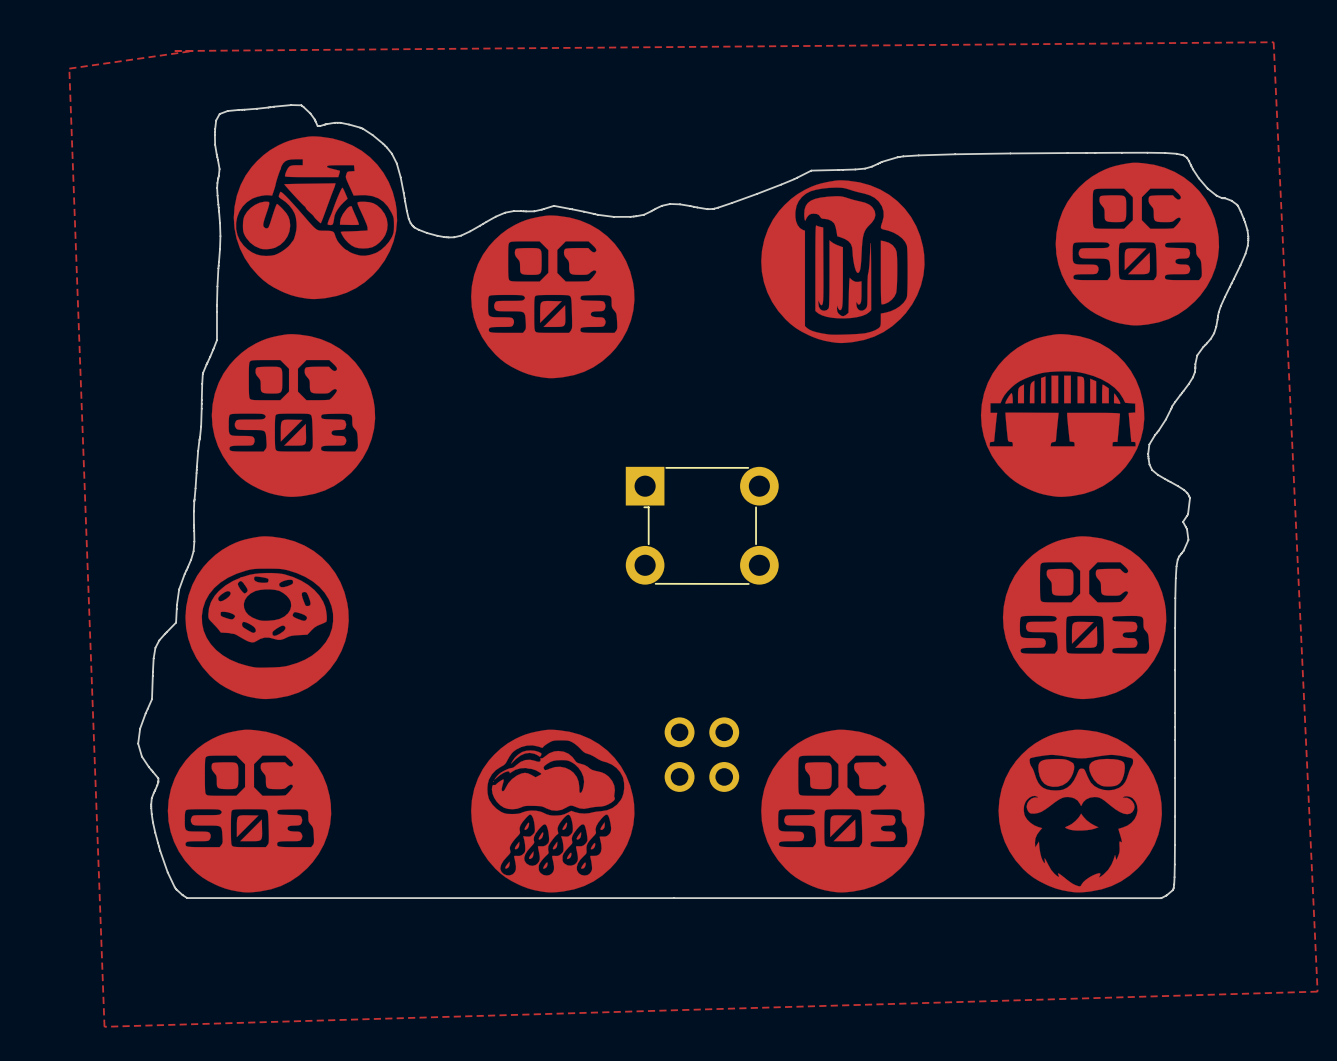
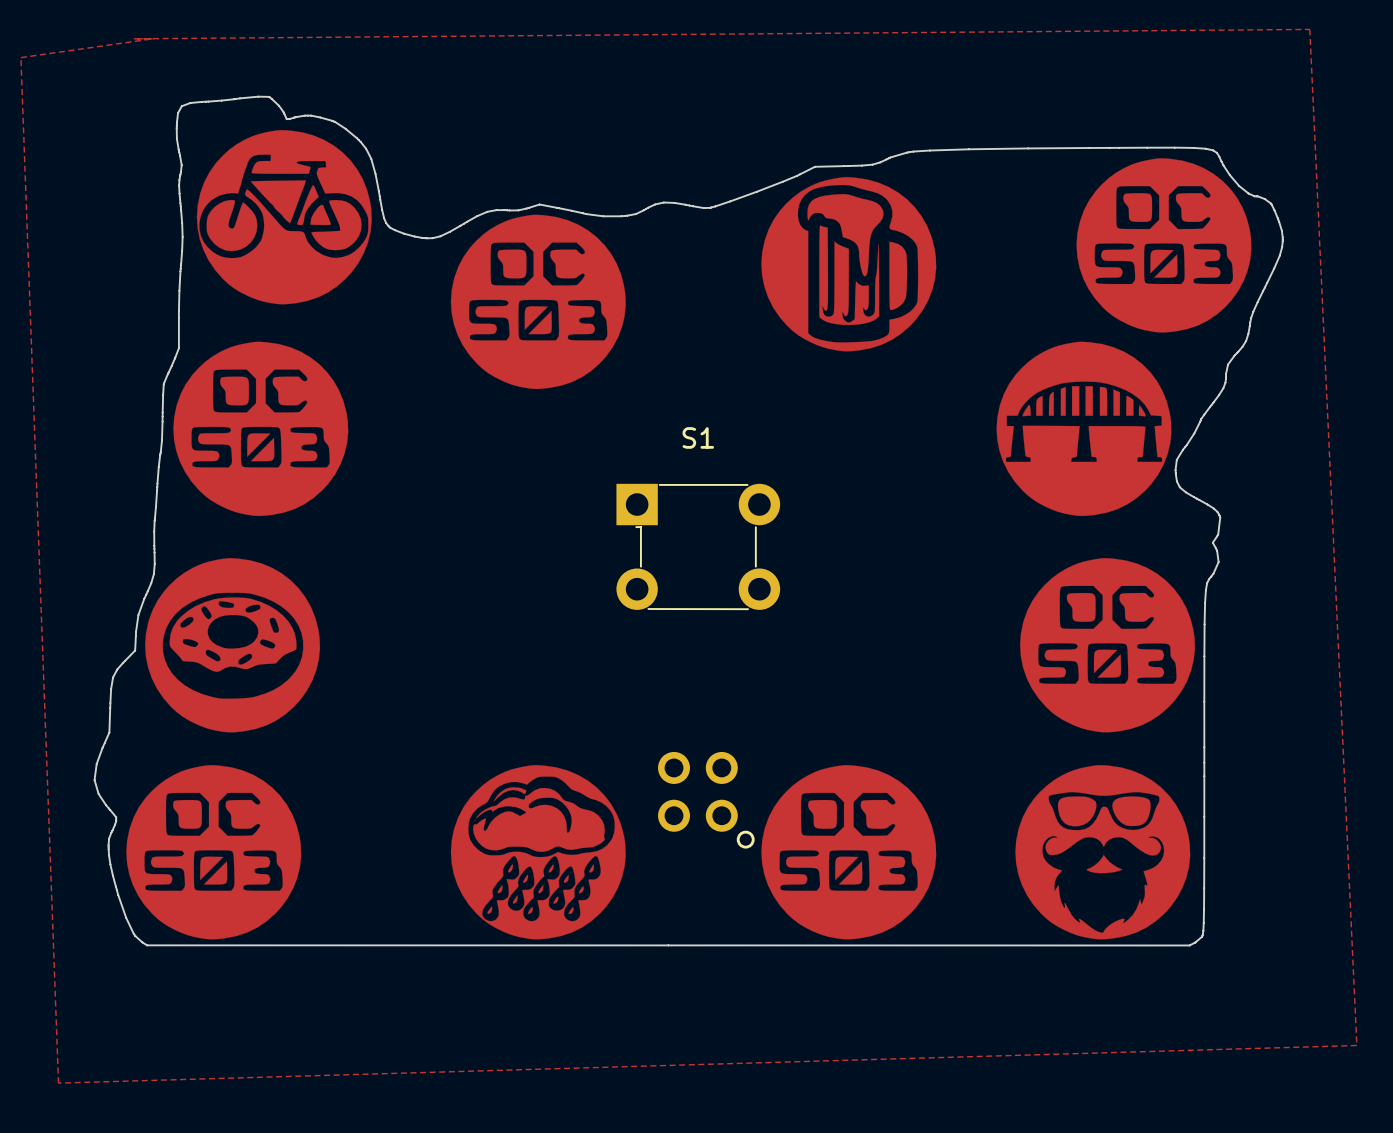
S1 name: none -> S1 (698, 437)
part footprint: [664, 717, 740, 792] -> [658, 751, 755, 849]

